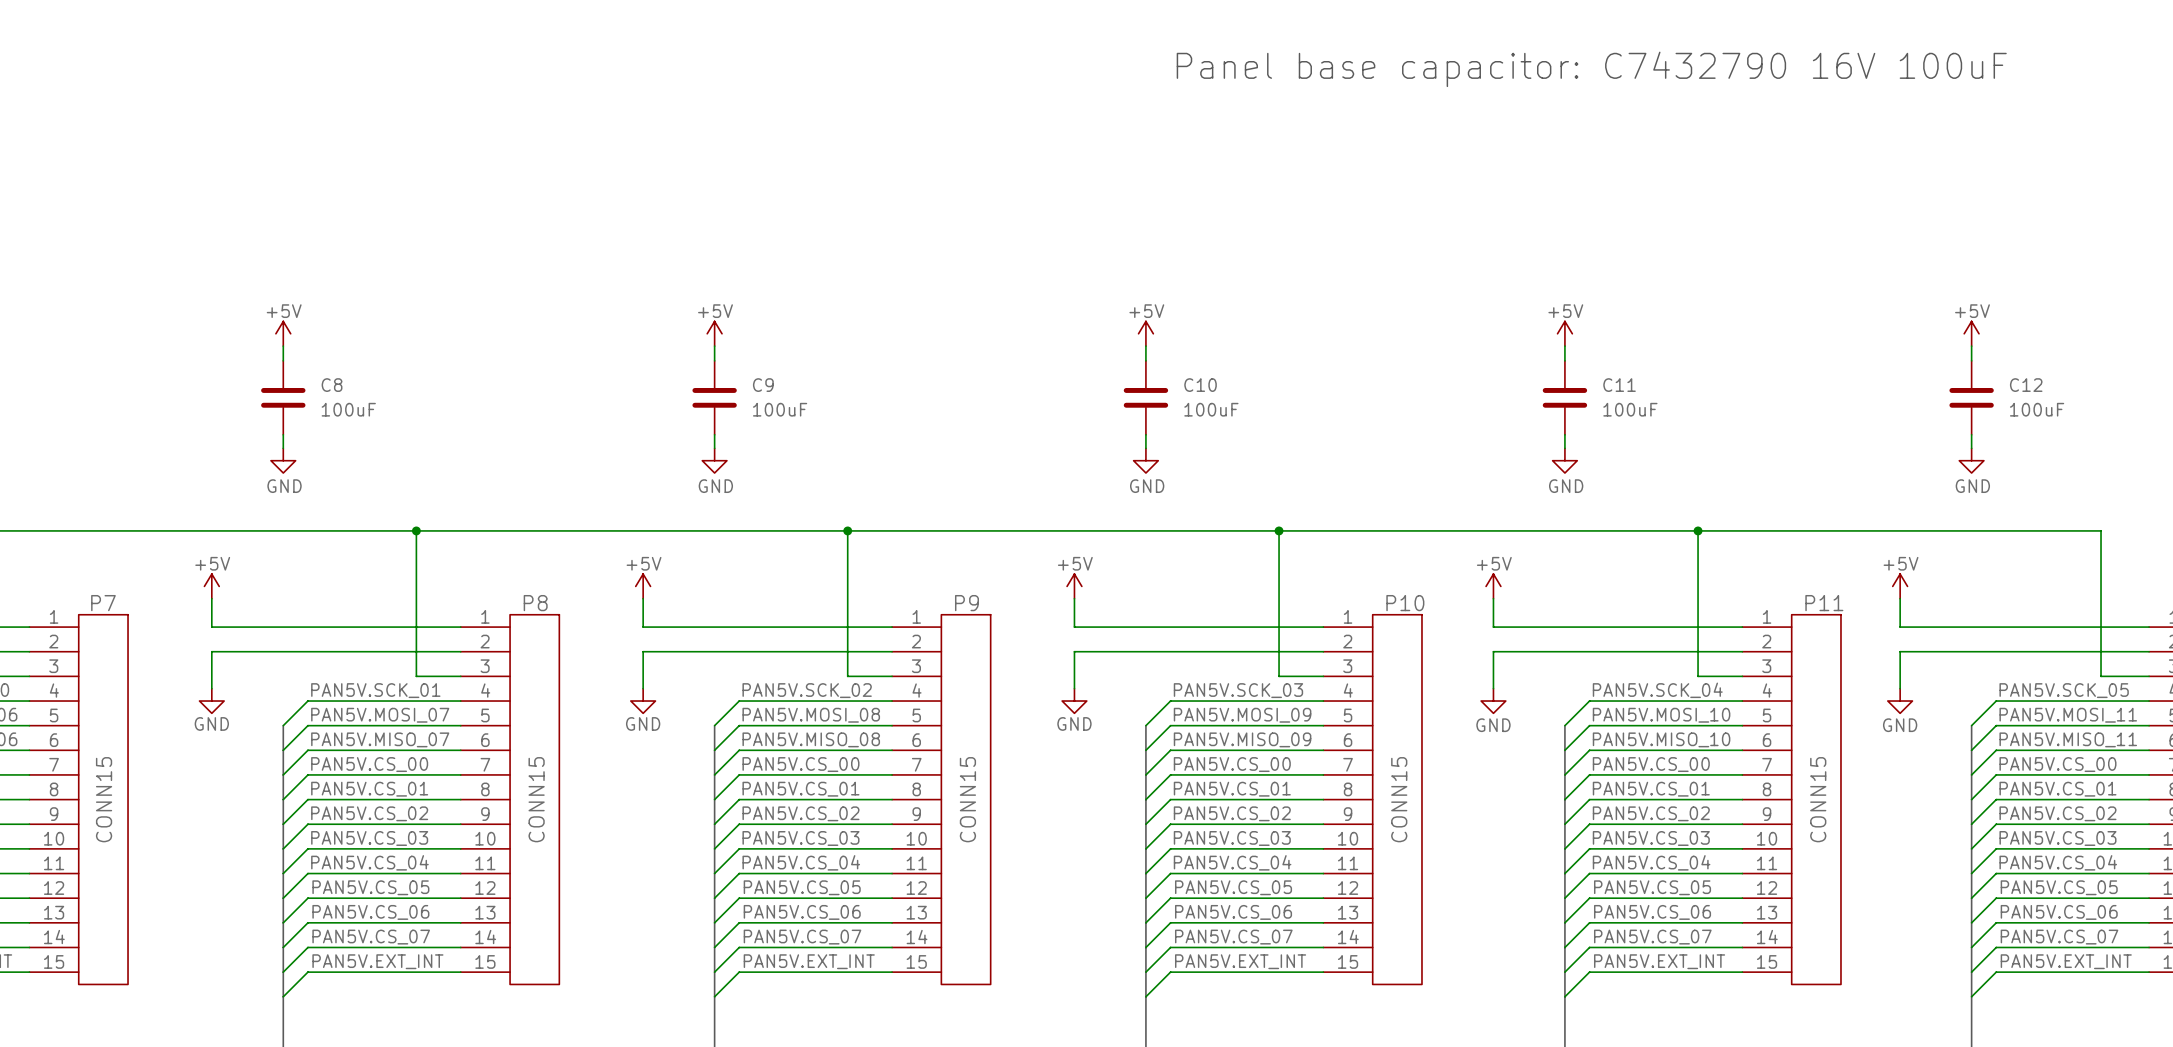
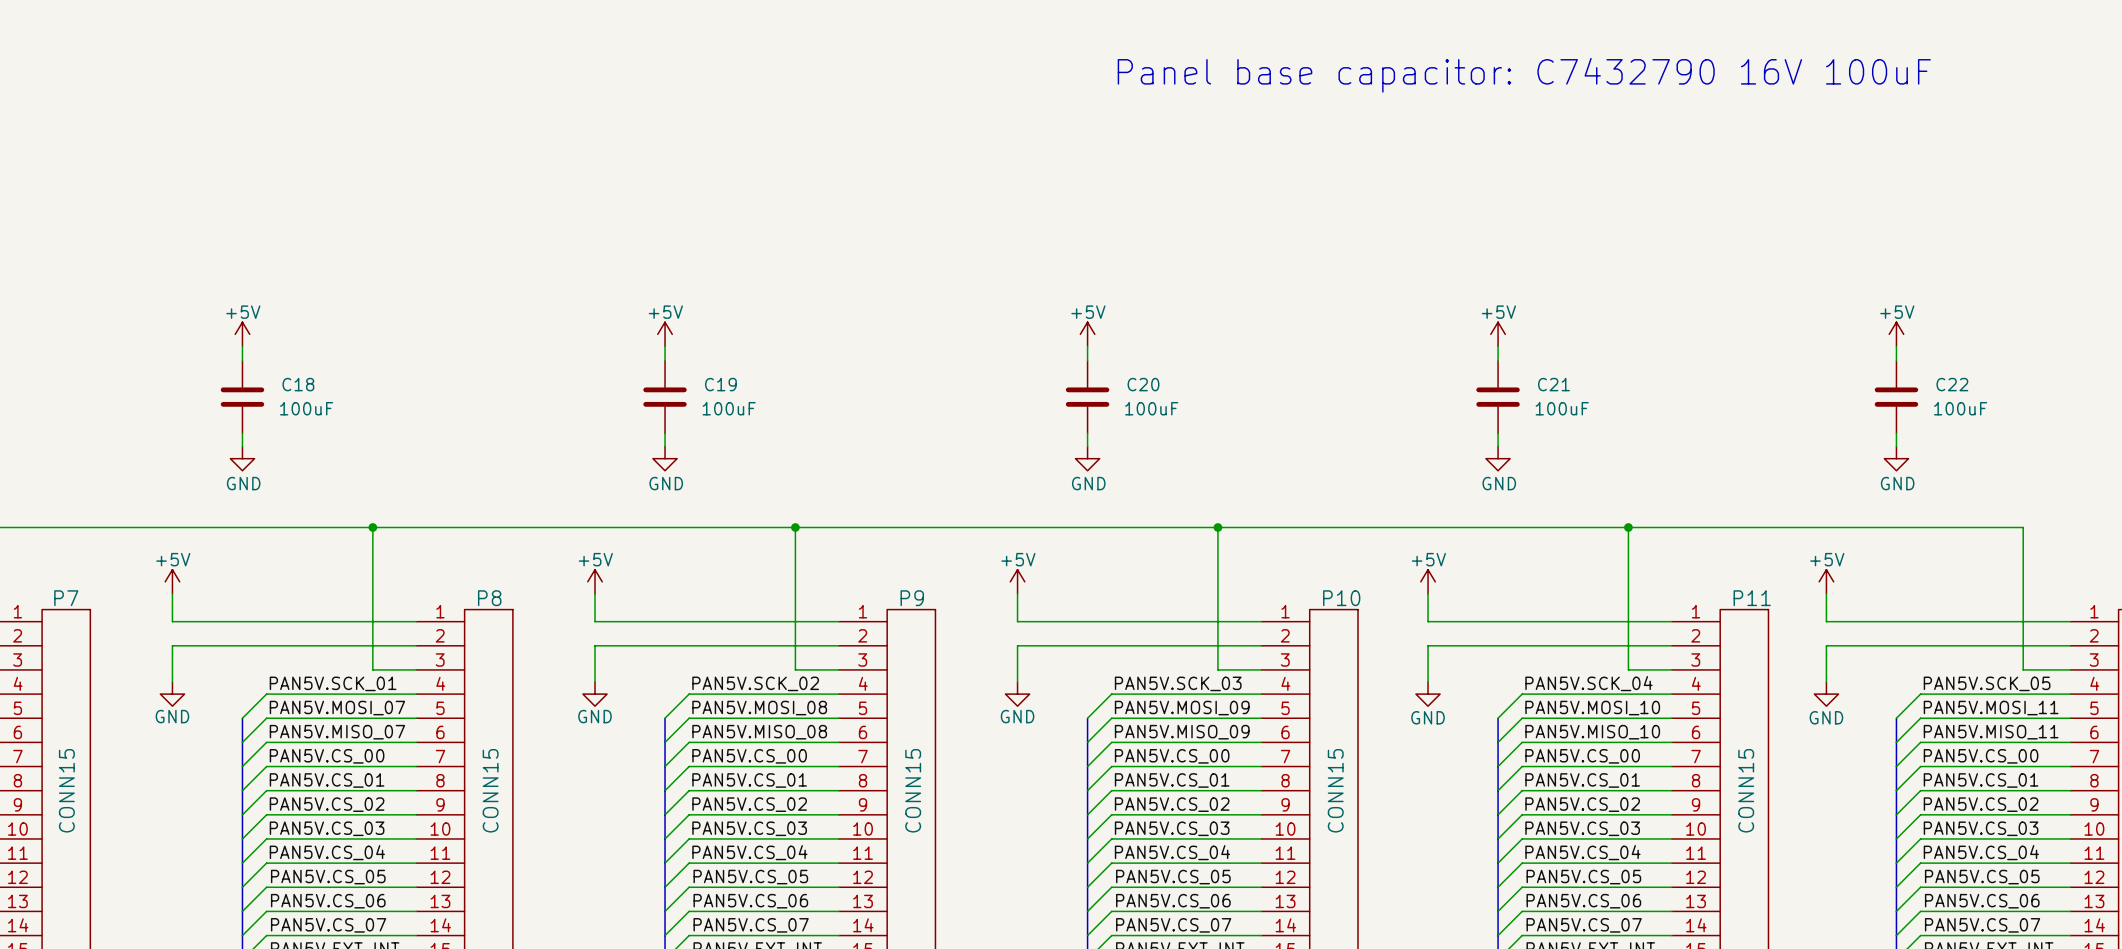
C8 name: C8 (332, 385) -> C18 (298, 384)
C9 name: C9 (763, 385) -> C19 (720, 384)
C10 name: C10 (1200, 385) -> C20 (1143, 384)
C11 name: C11 (1619, 385) -> C21 (1553, 384)
C12 name: C12 (2026, 385) -> C22 (1952, 384)

